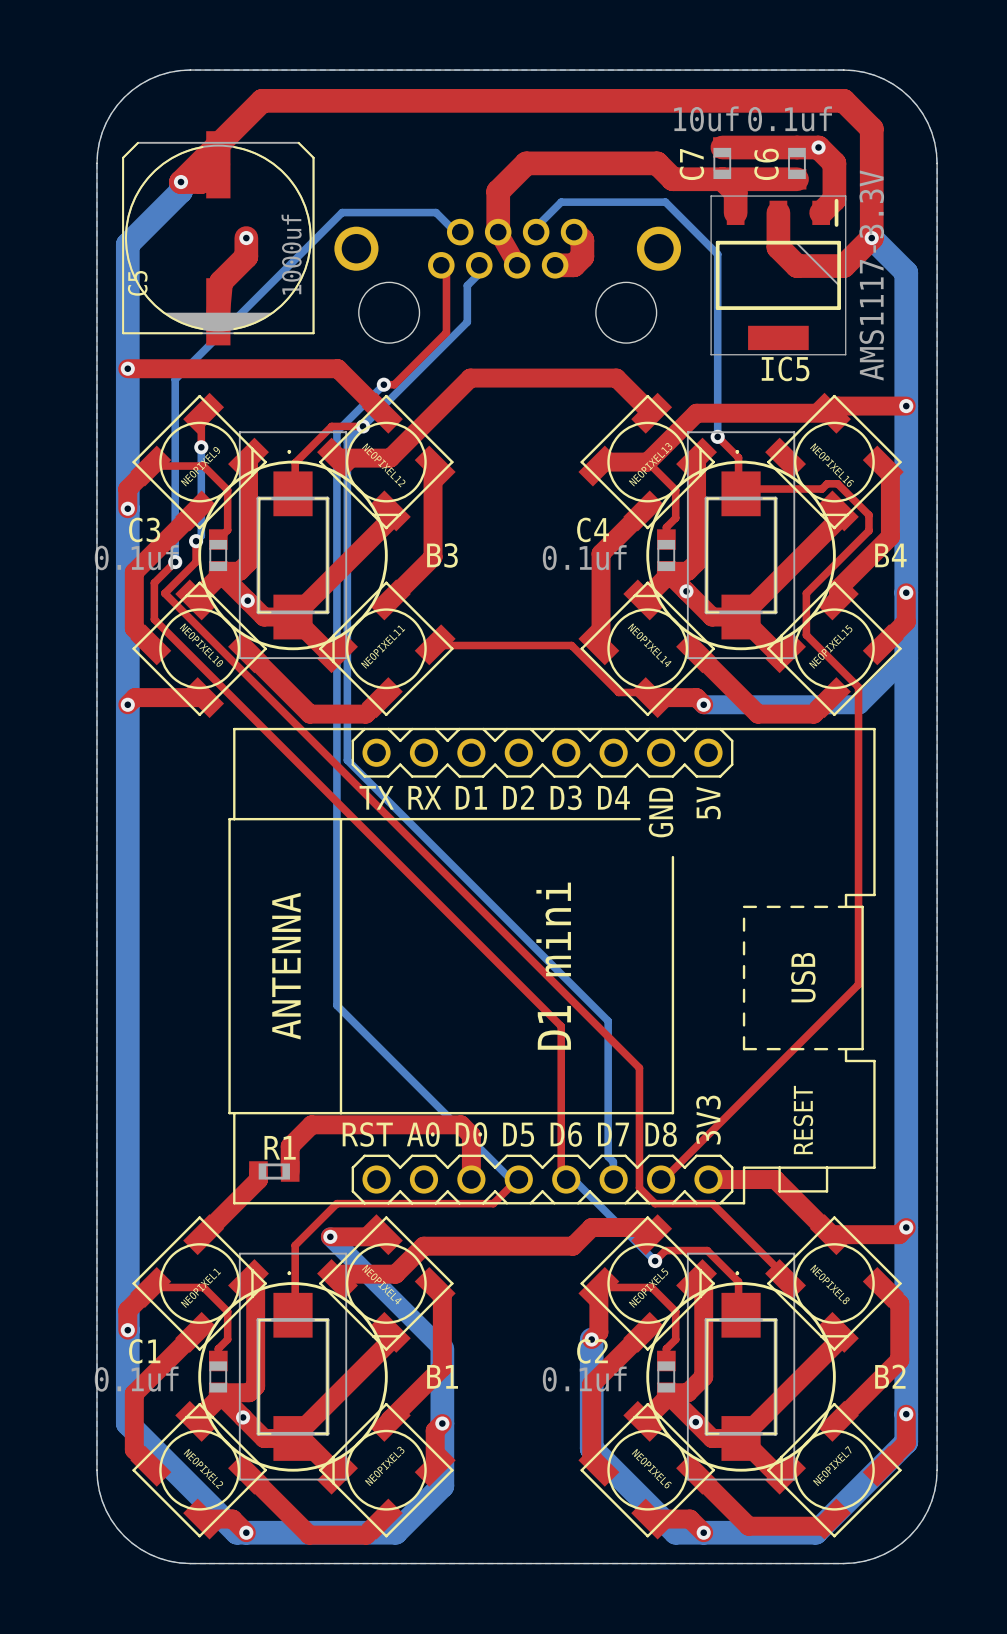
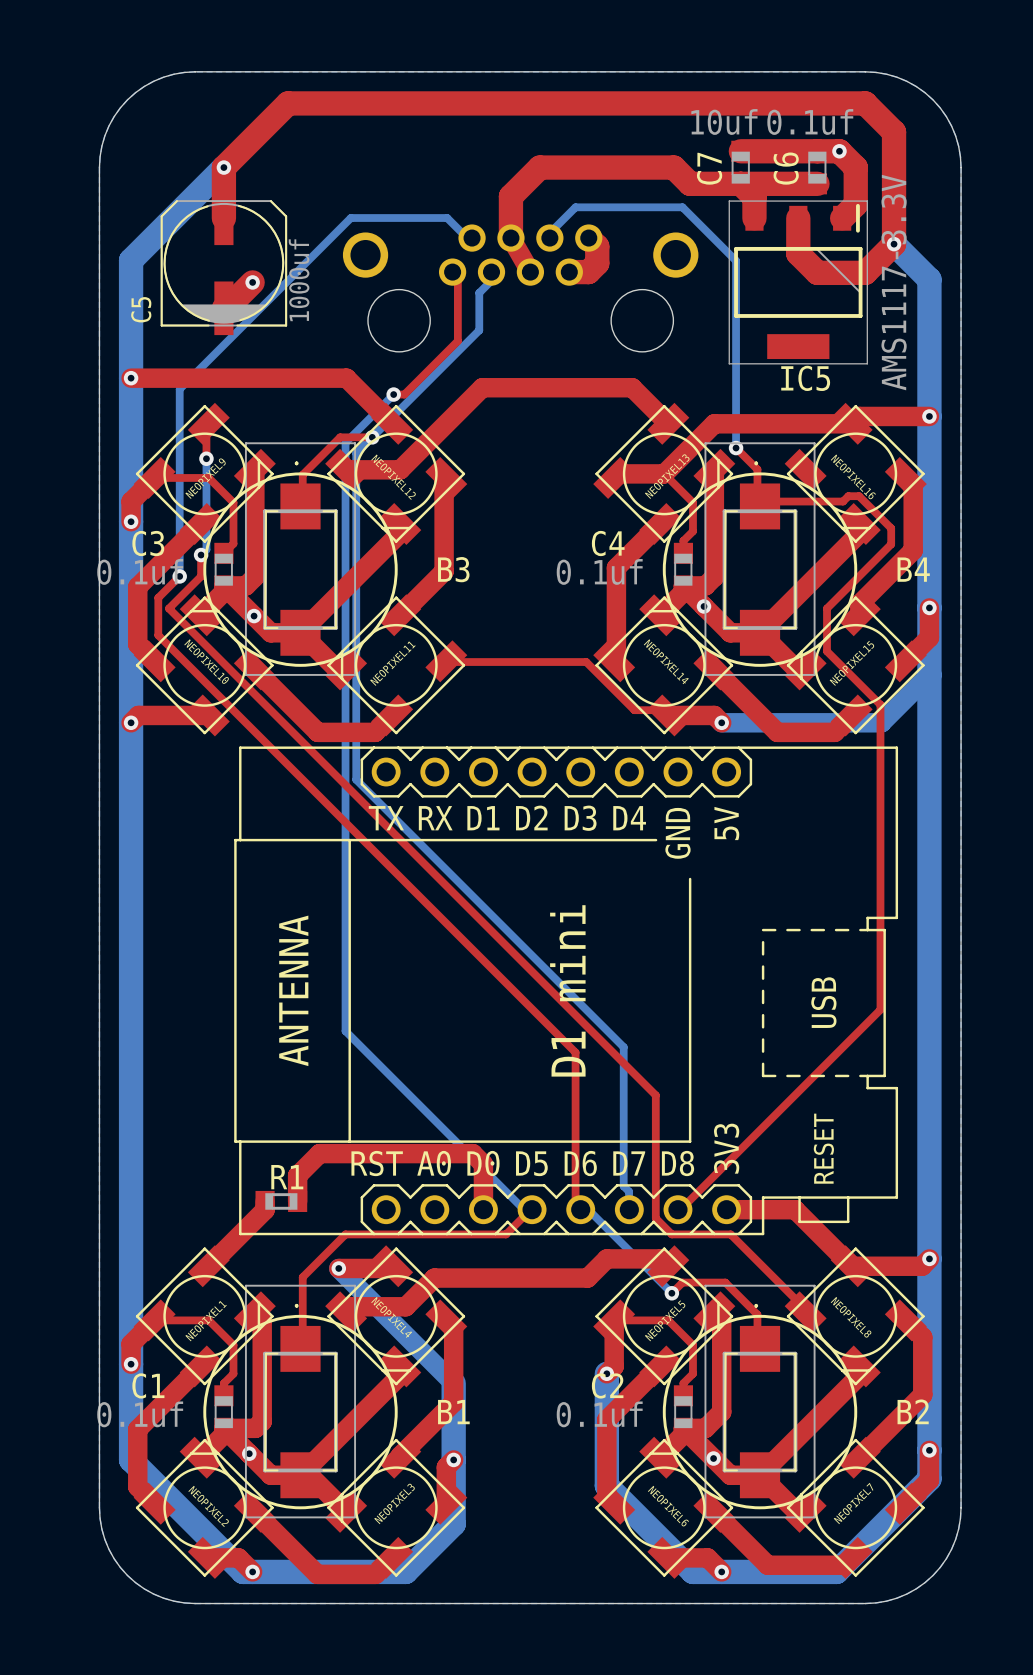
top track: (280, 100) (262, 100) (180, 182) (201, 182) (218, 164) -> (288, 103) (223, 167) (223, 218)
C5 footprint: [122, 131, 315, 346] -> [160, 191, 288, 336]
via: none -> (223, 167)
bottom track: (180, 182) (180, 191) (127, 244) (127, 253) -> (223, 167) (131, 260)
via: (180, 182) -> none
top track: (246, 238) (246, 256) (221, 281) (218, 311) -> none
via position: (246, 238) -> (252, 282)
top track: none -> (252, 282) (226, 308) (223, 308)

